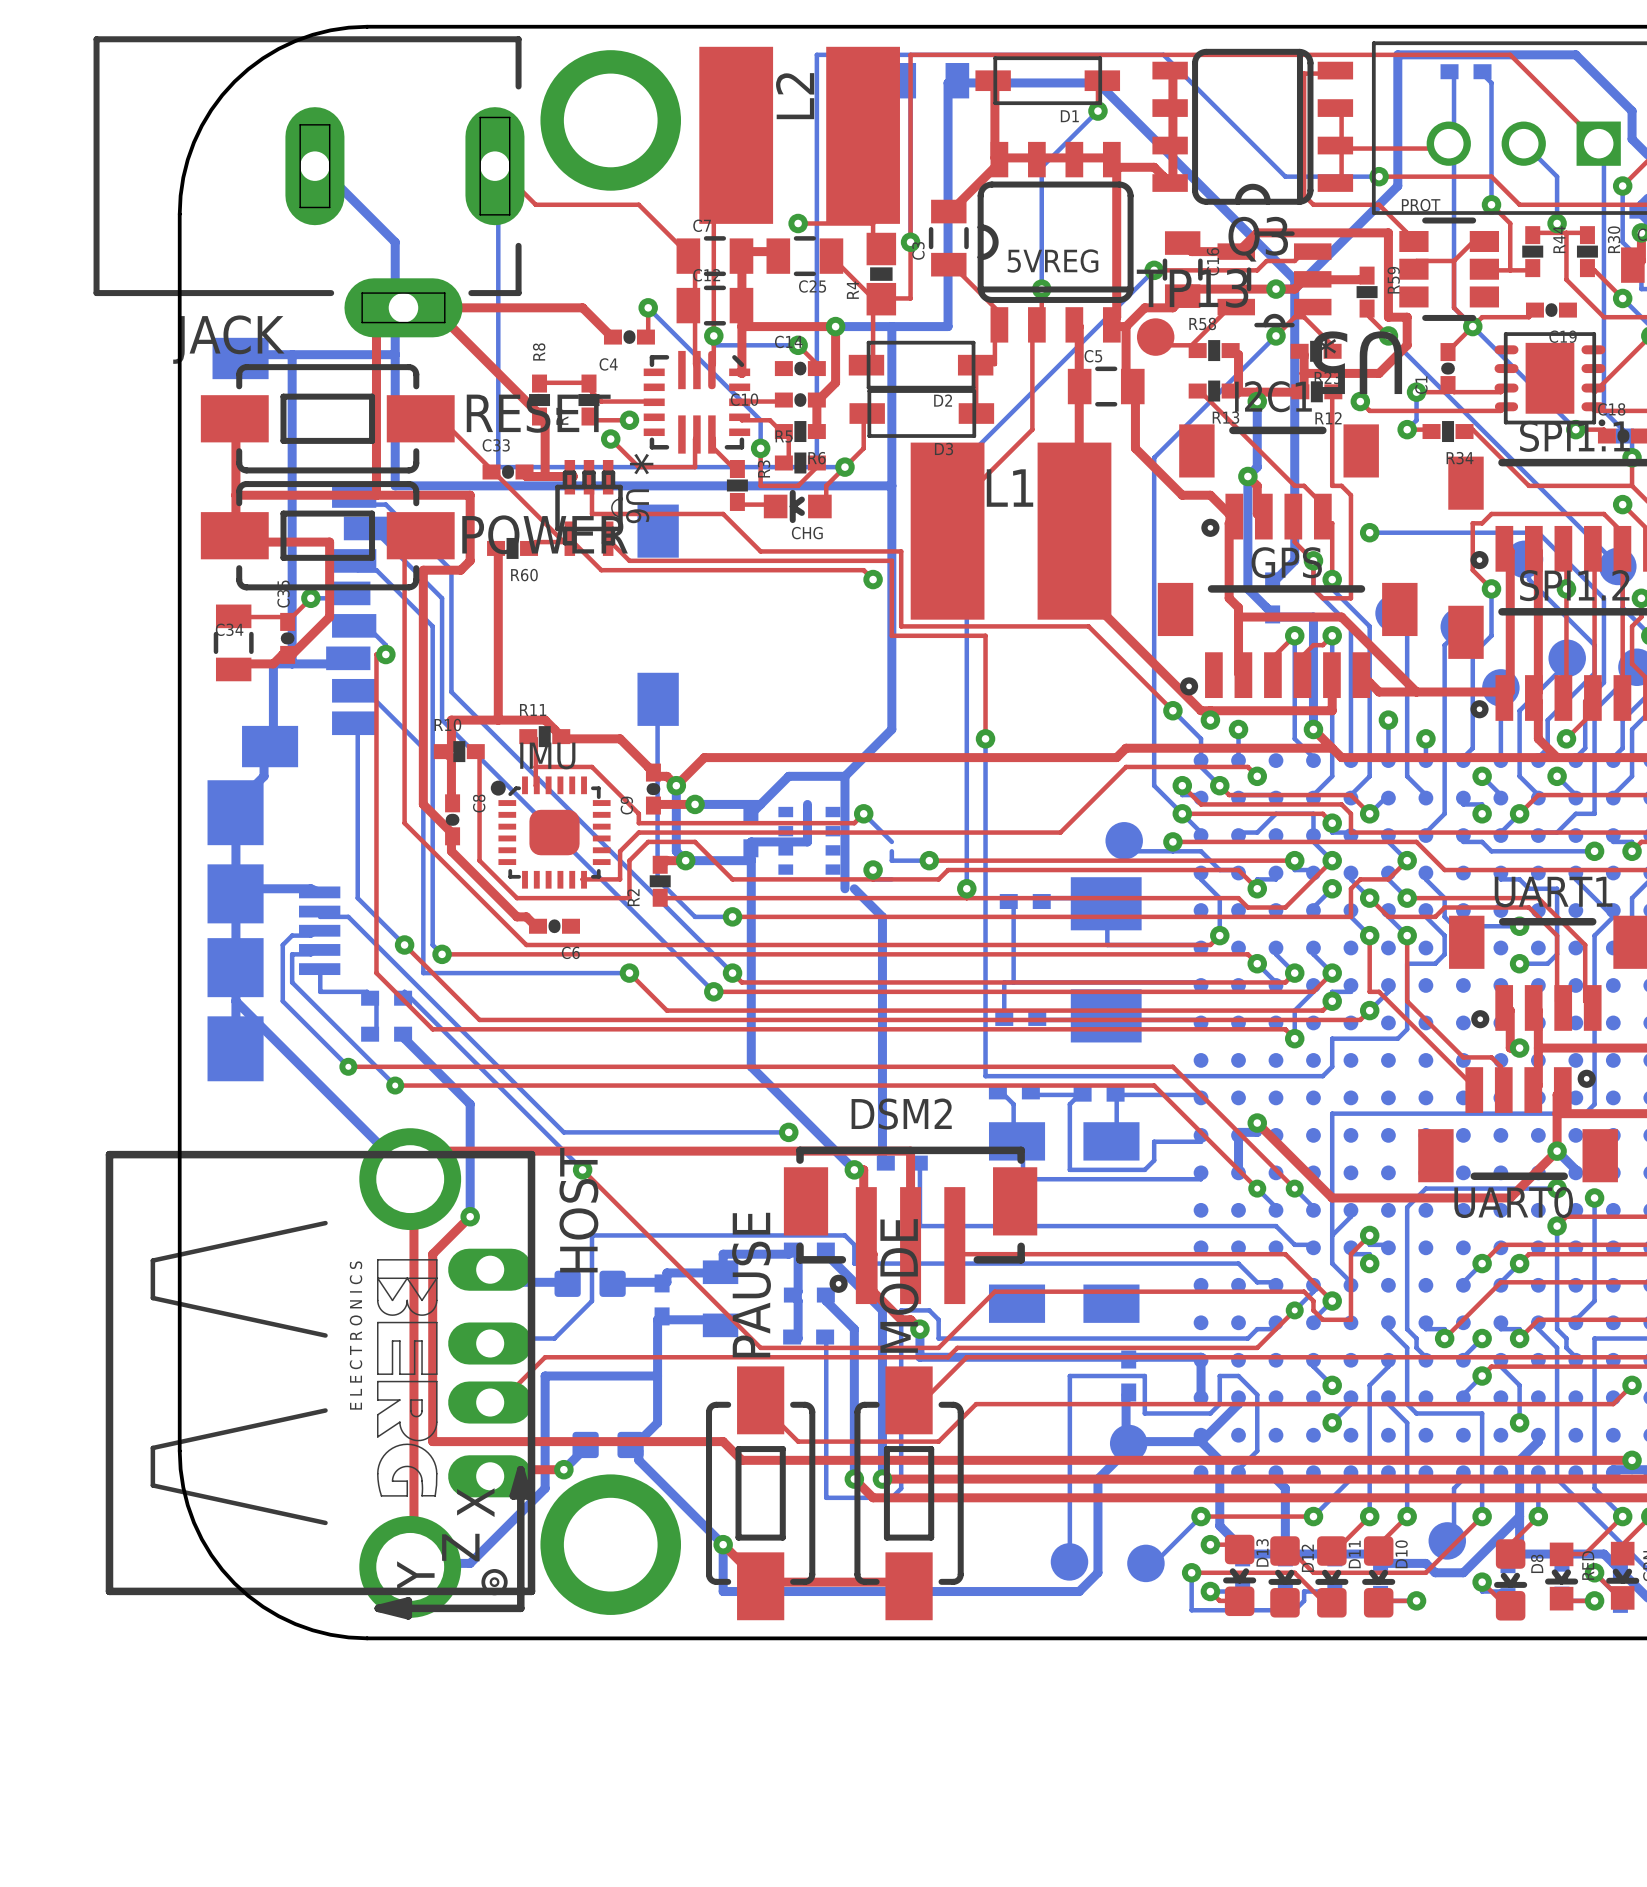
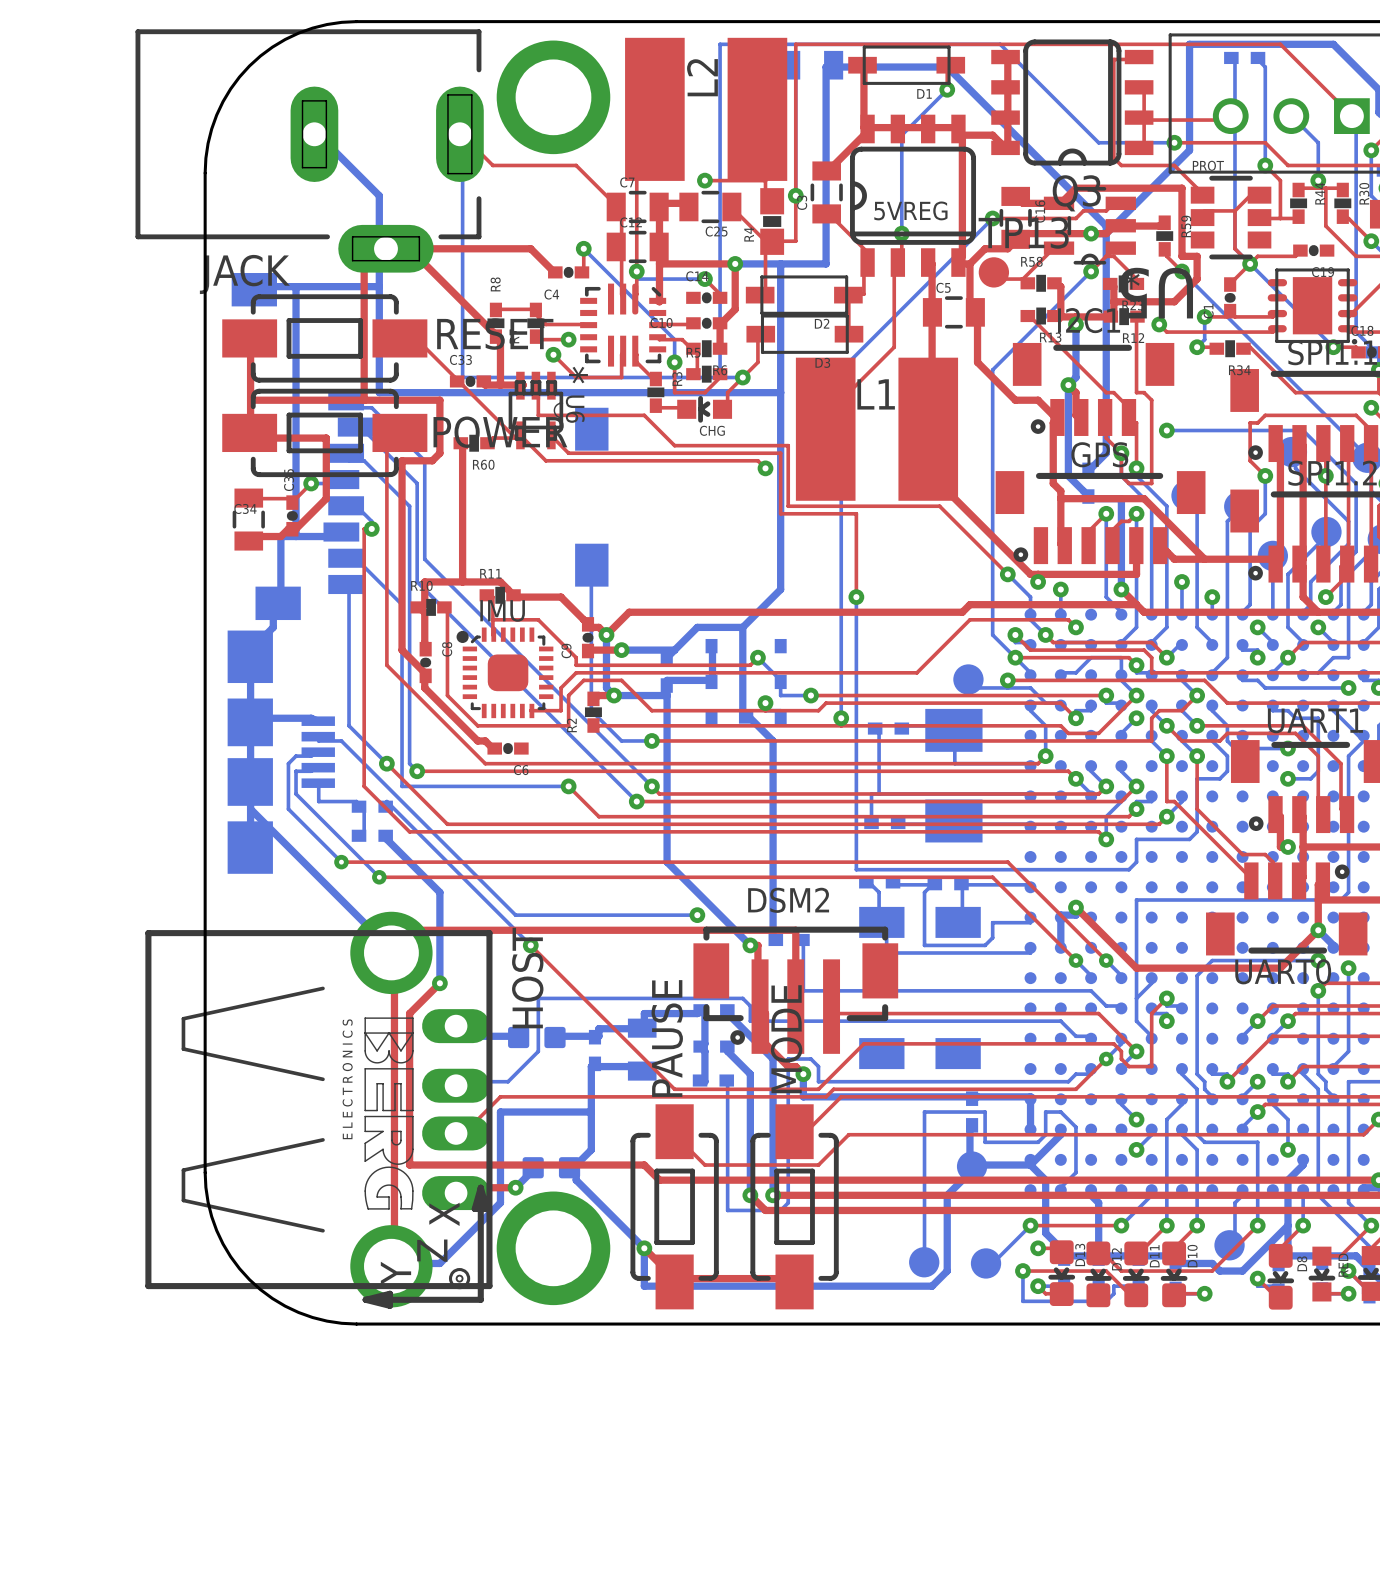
part: (809, 840) -> none
part: none -> (746, 681)

